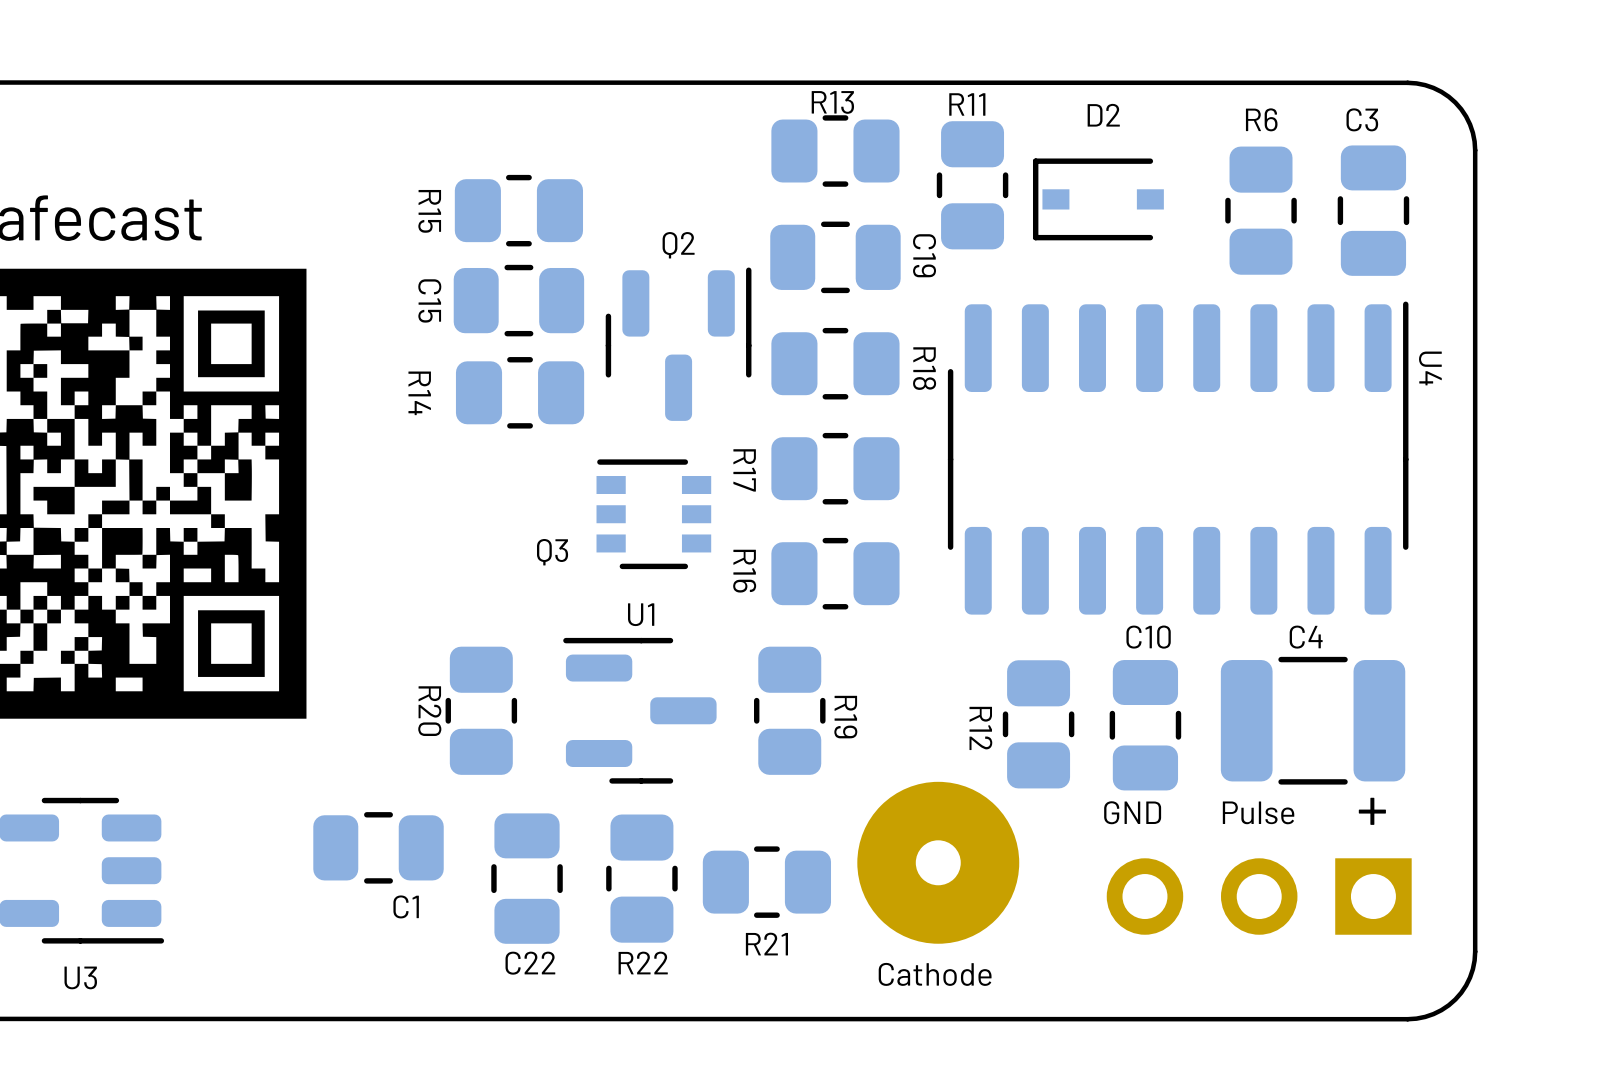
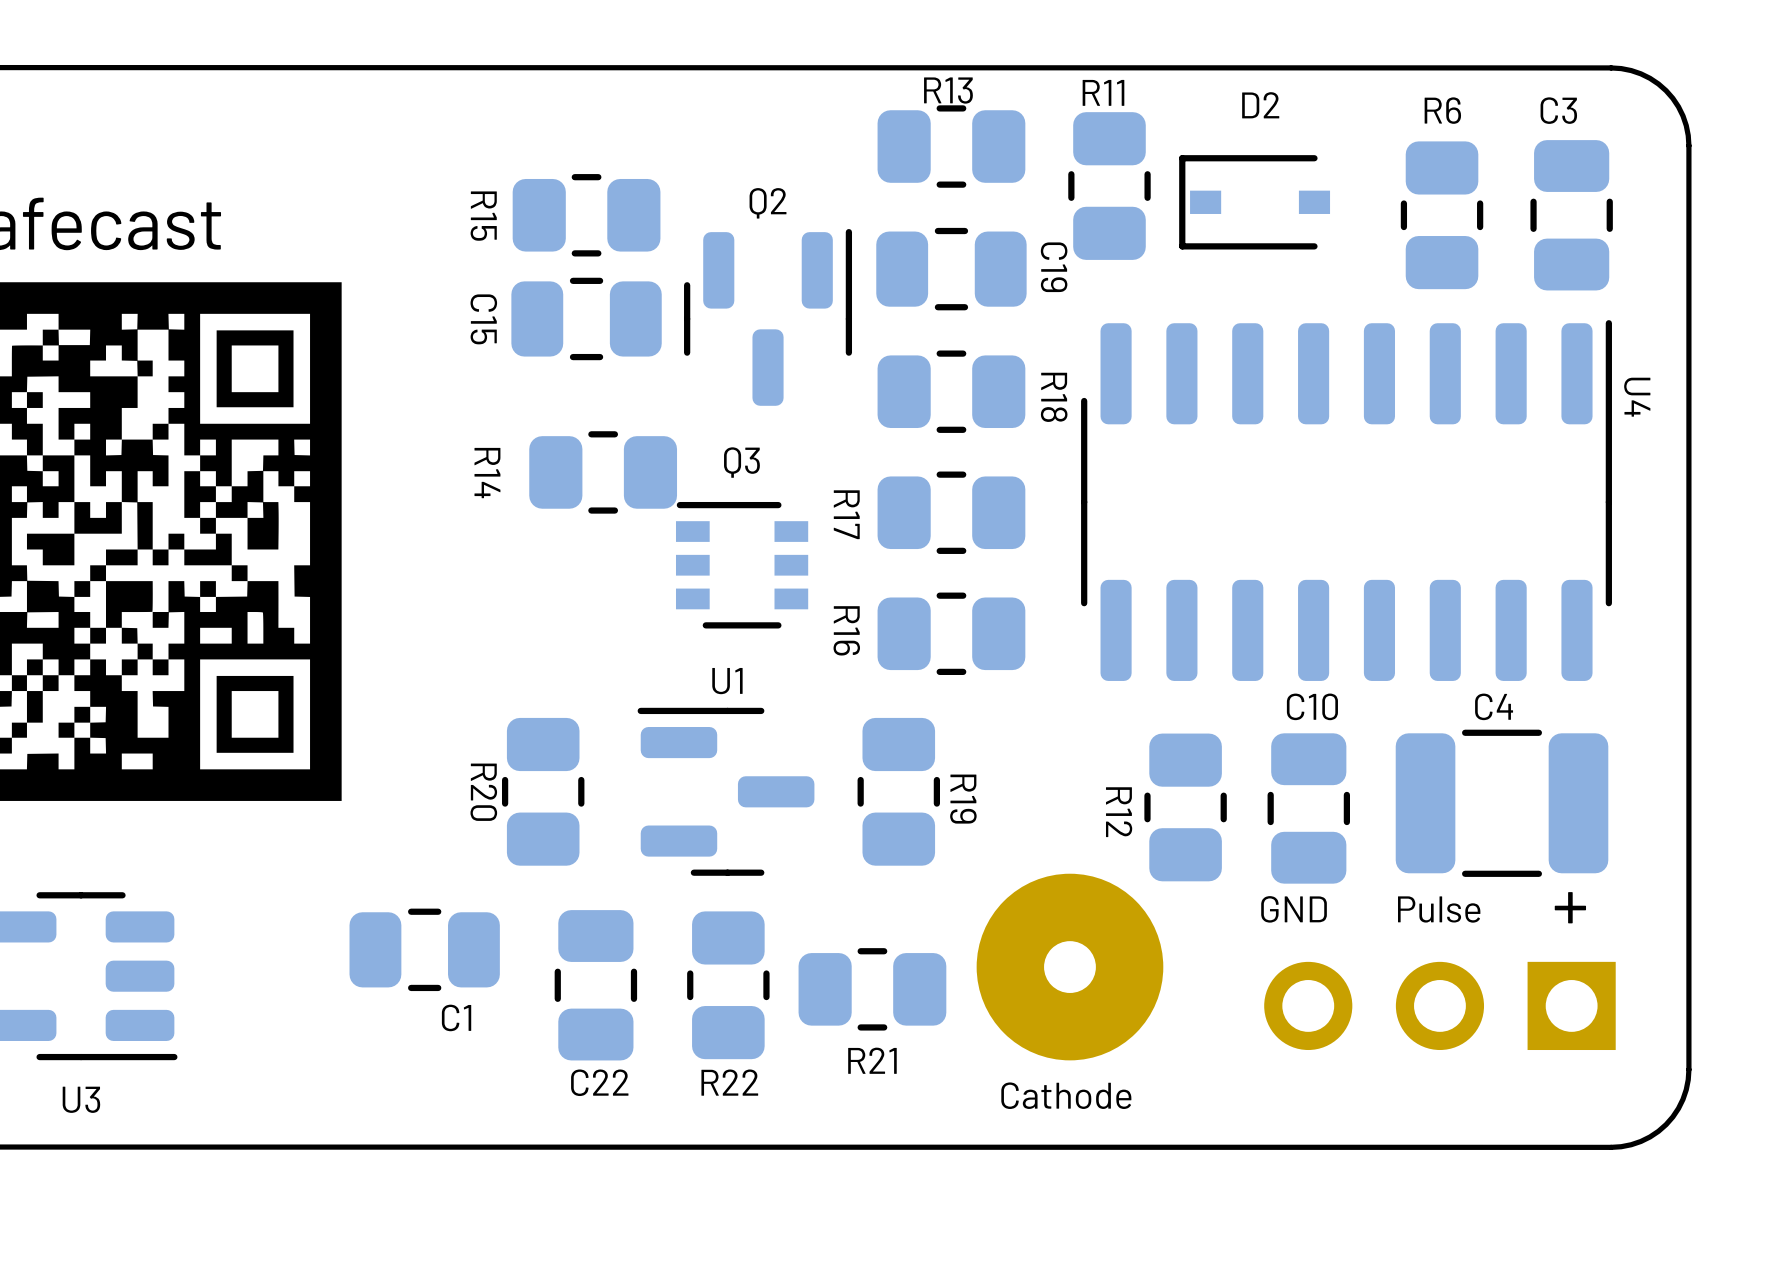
Q2 position: (678, 344) -> (768, 317)
R14 position: (520, 392) -> (603, 472)
Q3 name position: Q3 (552, 552) -> Q3 (741, 462)

